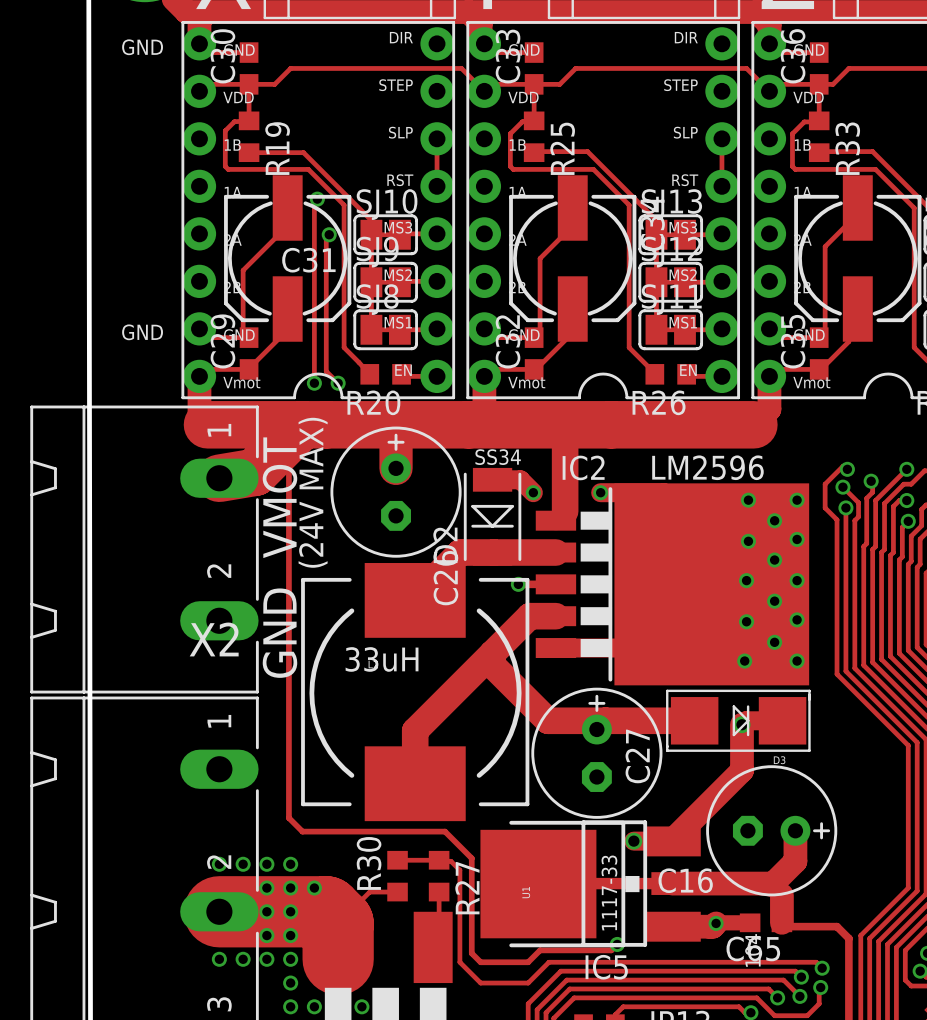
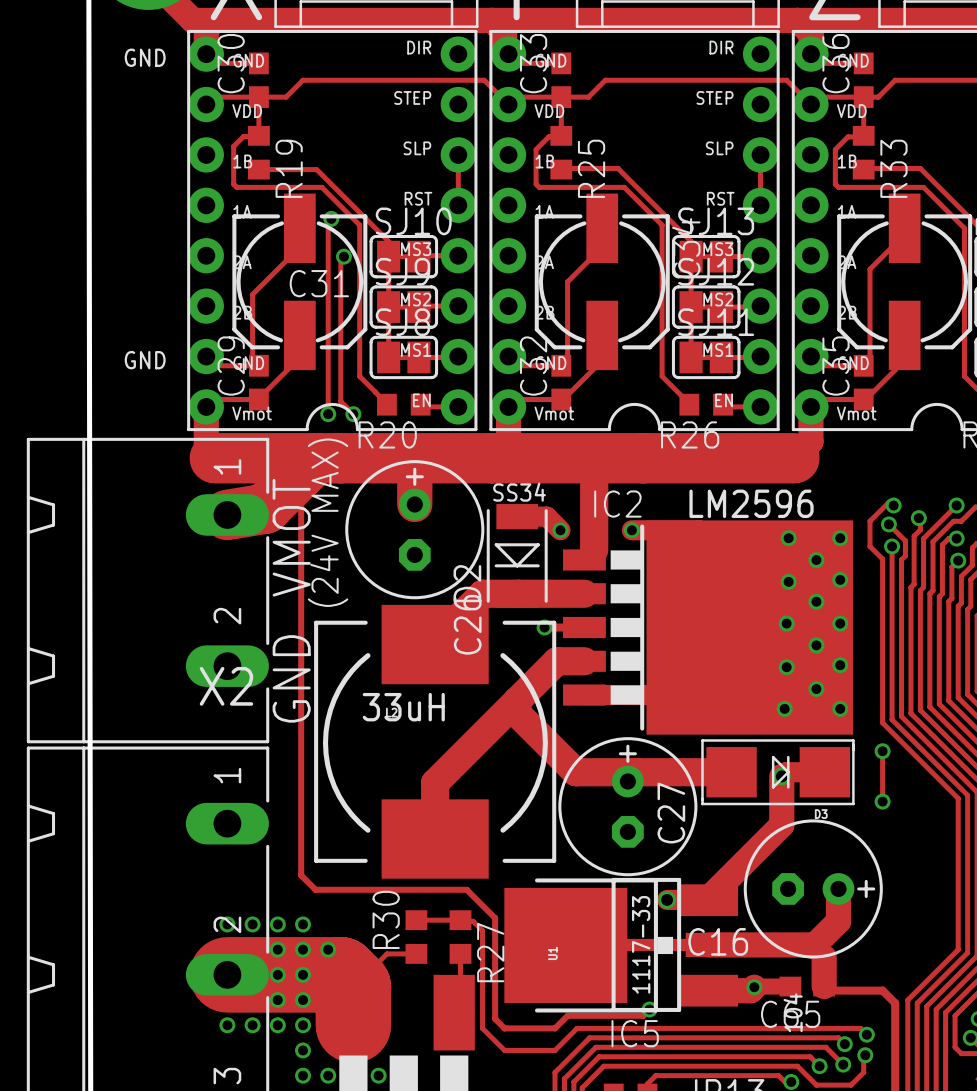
track: none -> (882, 751) (882, 801)
via: none -> (882, 751)
via: none -> (882, 801)

